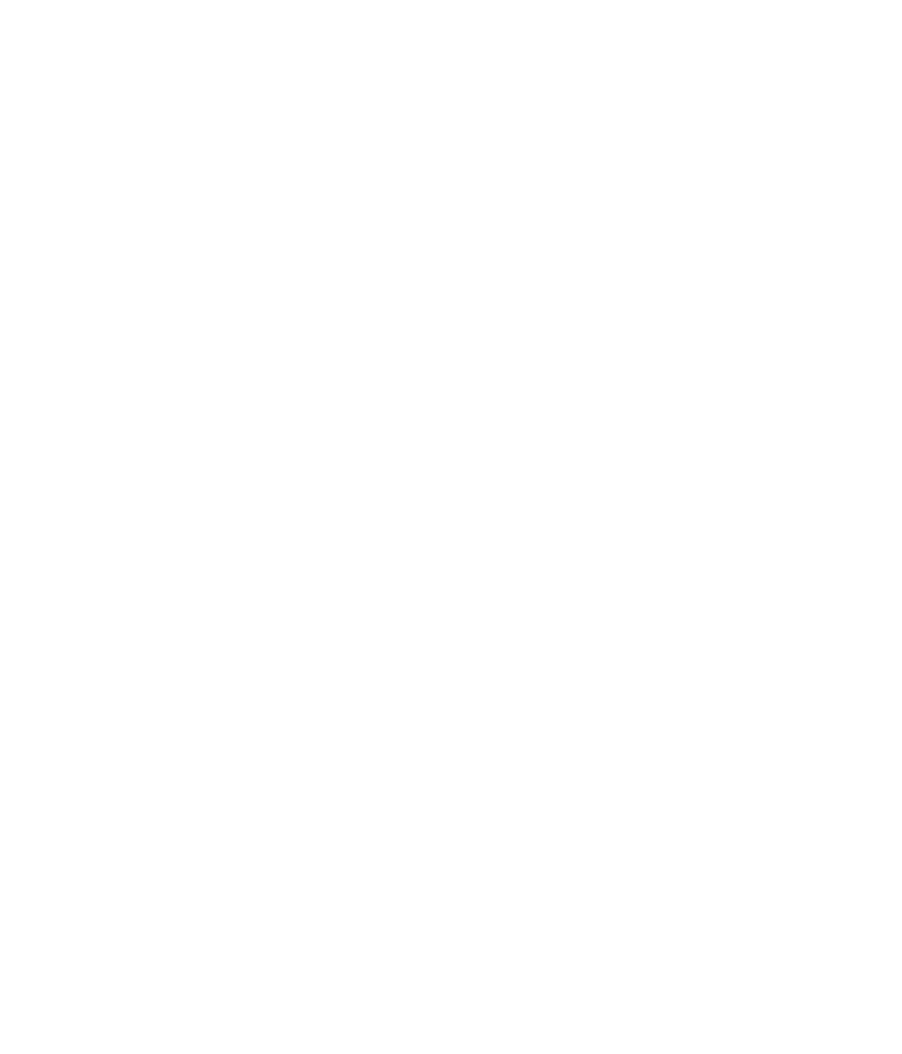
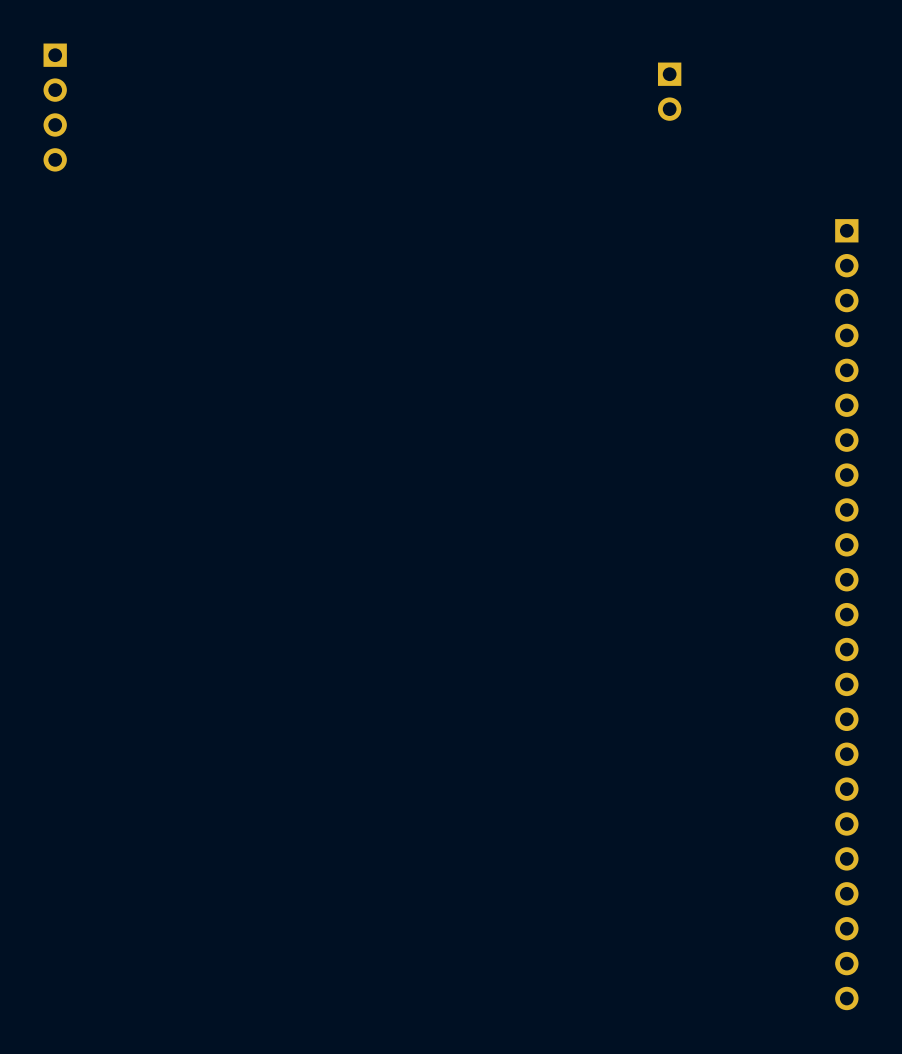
part: none -> (669, 91)
part: none -> (55, 107)
part: none -> (846, 614)

